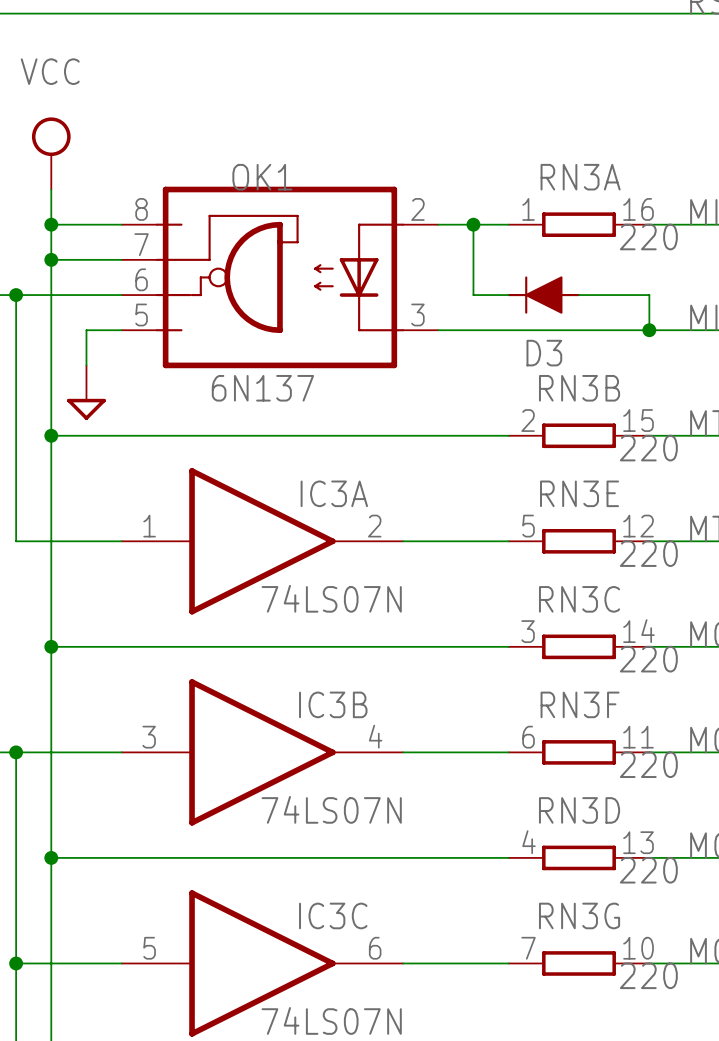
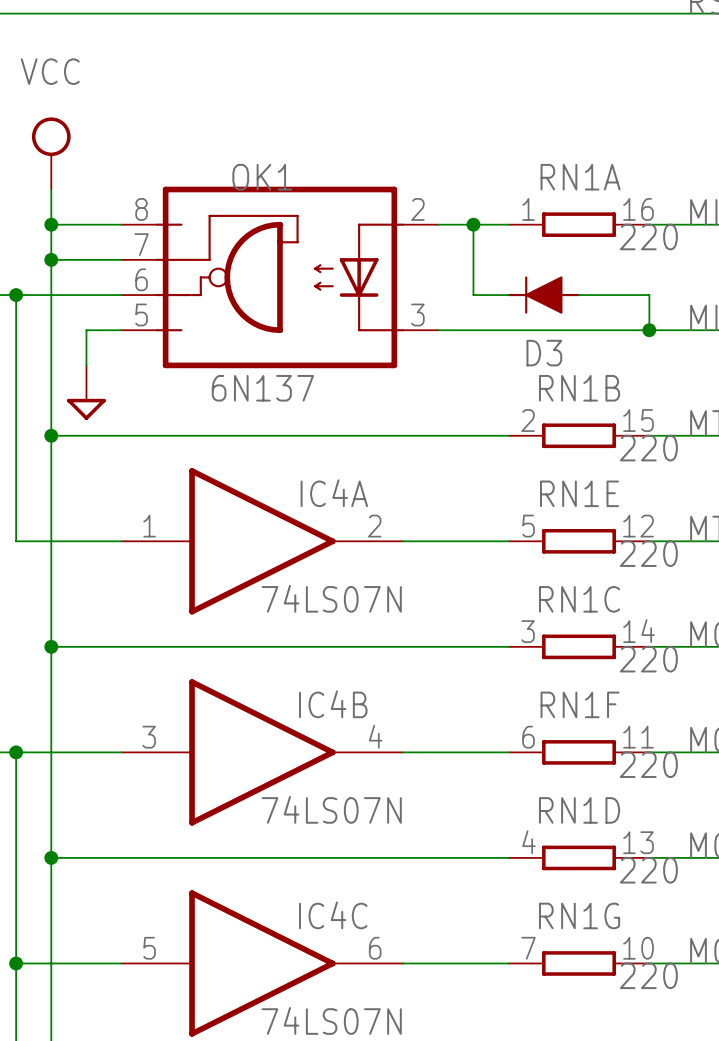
RN3A name: RN3A (580, 177) -> RN1A (580, 177)
RN3B name: RN3B (579, 388) -> RN1B (579, 388)
IC3A name: IC3A (334, 493) -> IC4A (334, 493)
RN3E name: RN3E (579, 493) -> RN1E (579, 493)
RN3C name: RN3C (579, 599) -> RN1C (579, 599)
IC3B name: IC3B (333, 704) -> IC4B (333, 704)
RN3F name: RN3F (580, 704) -> RN1F (580, 704)
RN3D name: RN3D (579, 810) -> RN1D (579, 810)
IC3C name: IC3C (333, 915) -> IC4C (333, 915)
RN3G name: RN3G (579, 915) -> RN1G (579, 915)

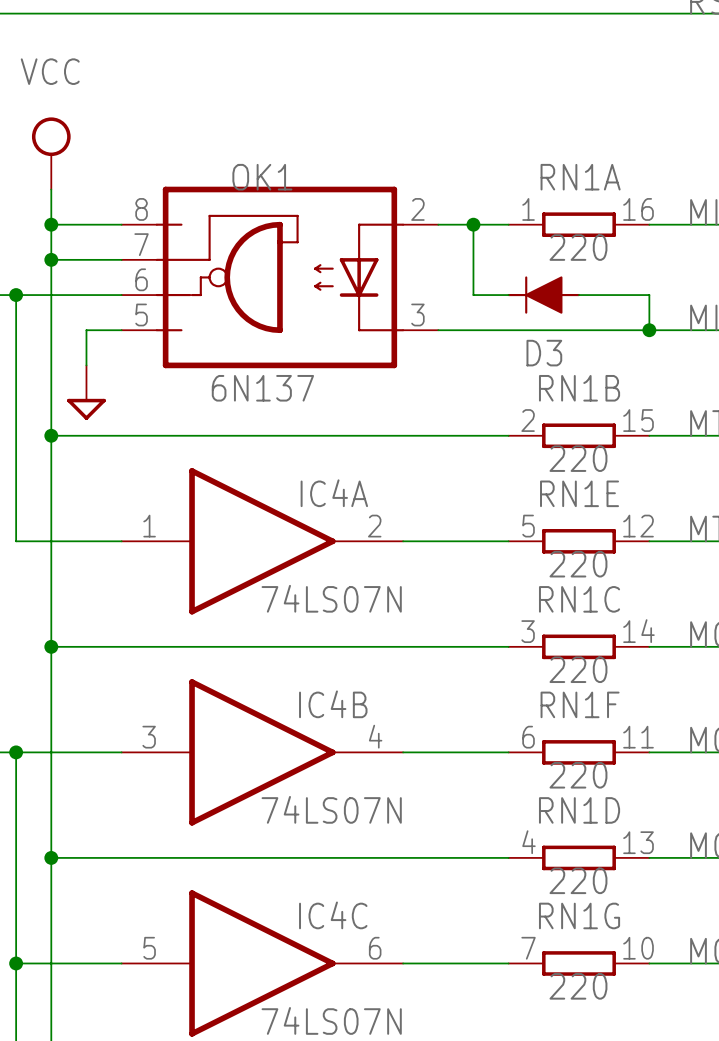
RN1A value position: 220 (648, 237) -> 220 (578, 247)
RN1B value position: 220 (648, 448) -> 220 (578, 458)
RN1E value position: 220 (648, 553) -> 220 (578, 564)
RN1C value position: 220 (648, 659) -> 220 (578, 669)
RN1F value position: 220 (648, 764) -> 220 (578, 775)
RN1D value position: 220 (648, 870) -> 220 (578, 880)
RN1G value position: 220 (648, 975) -> 220 (578, 986)

